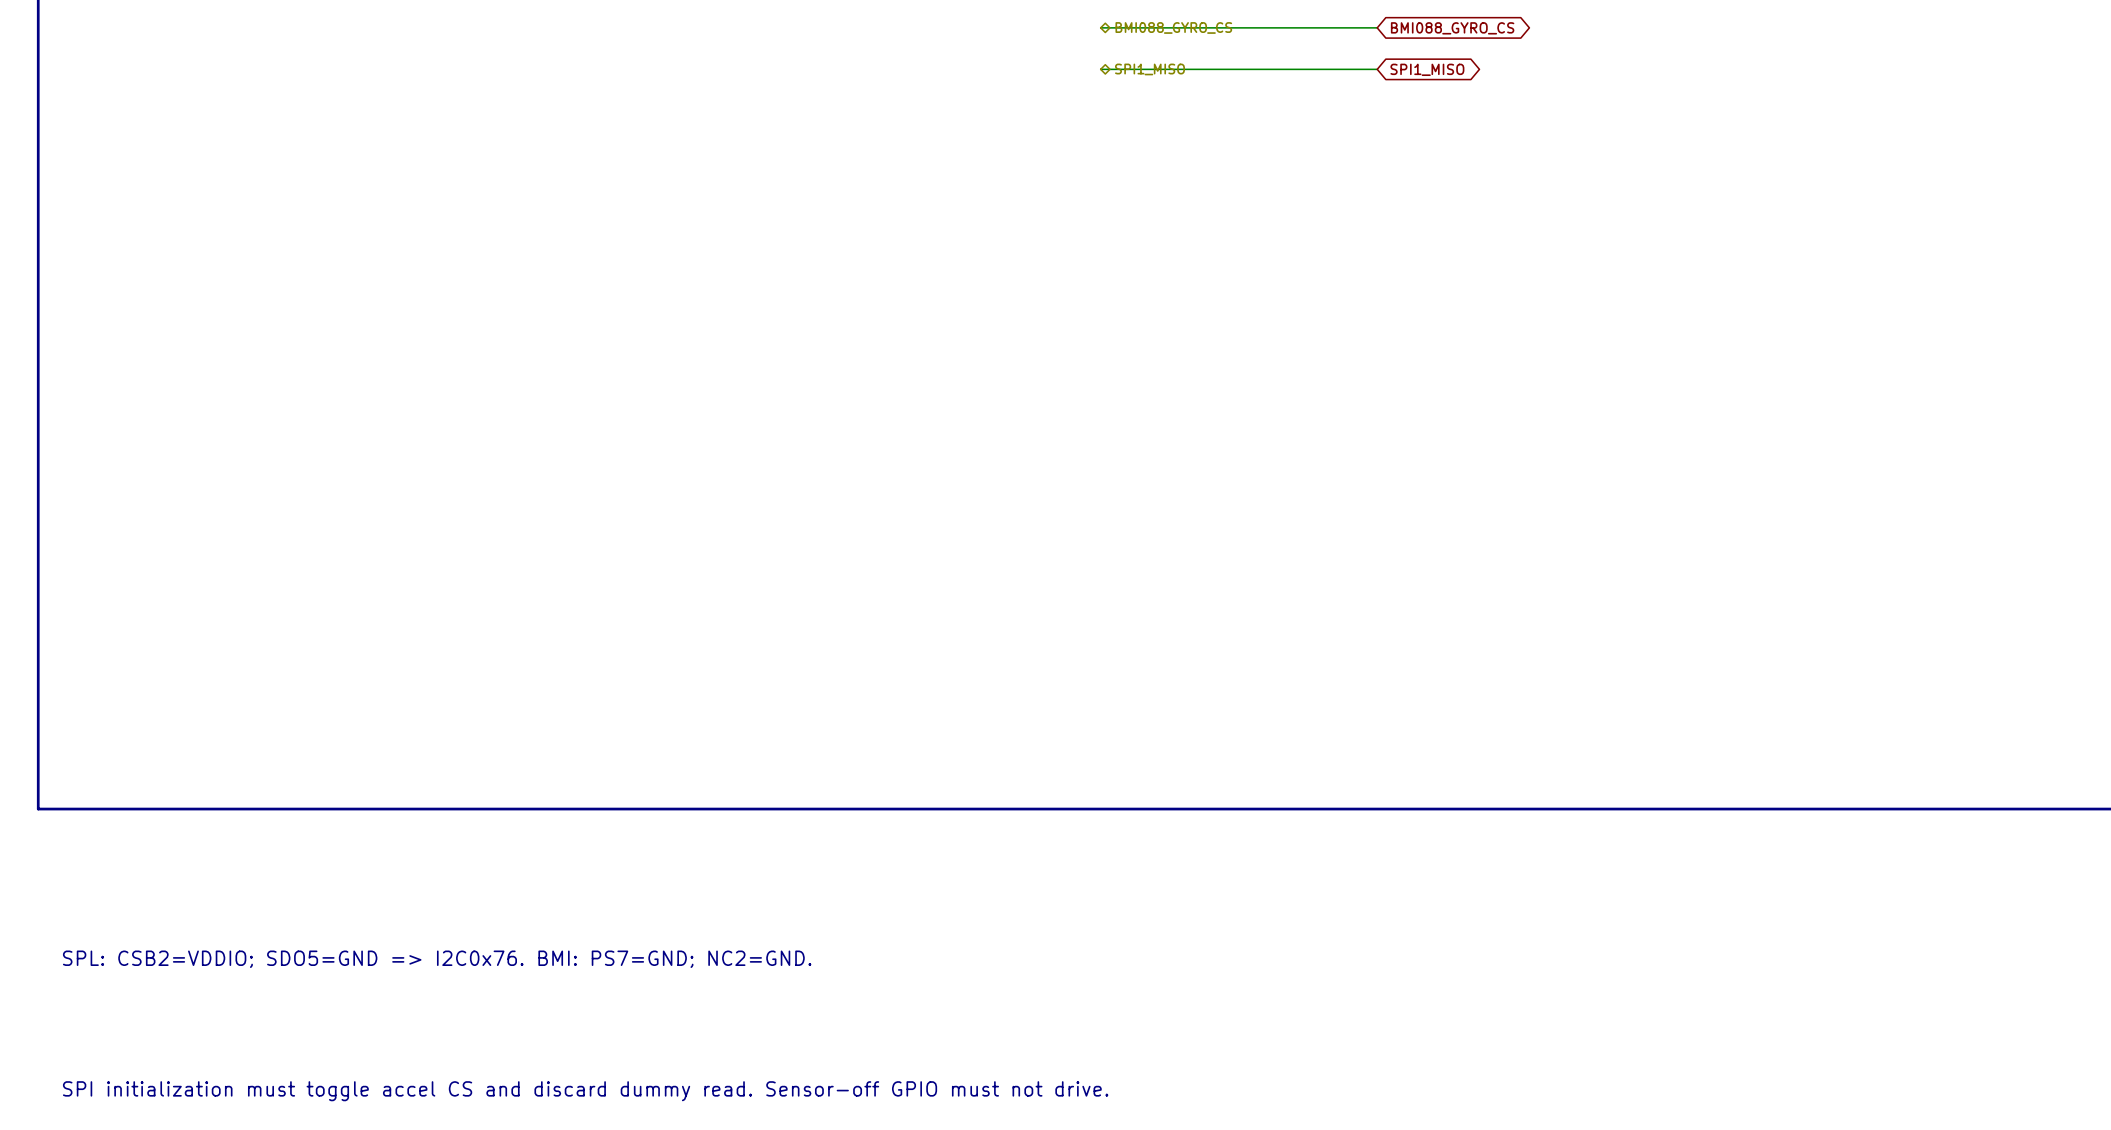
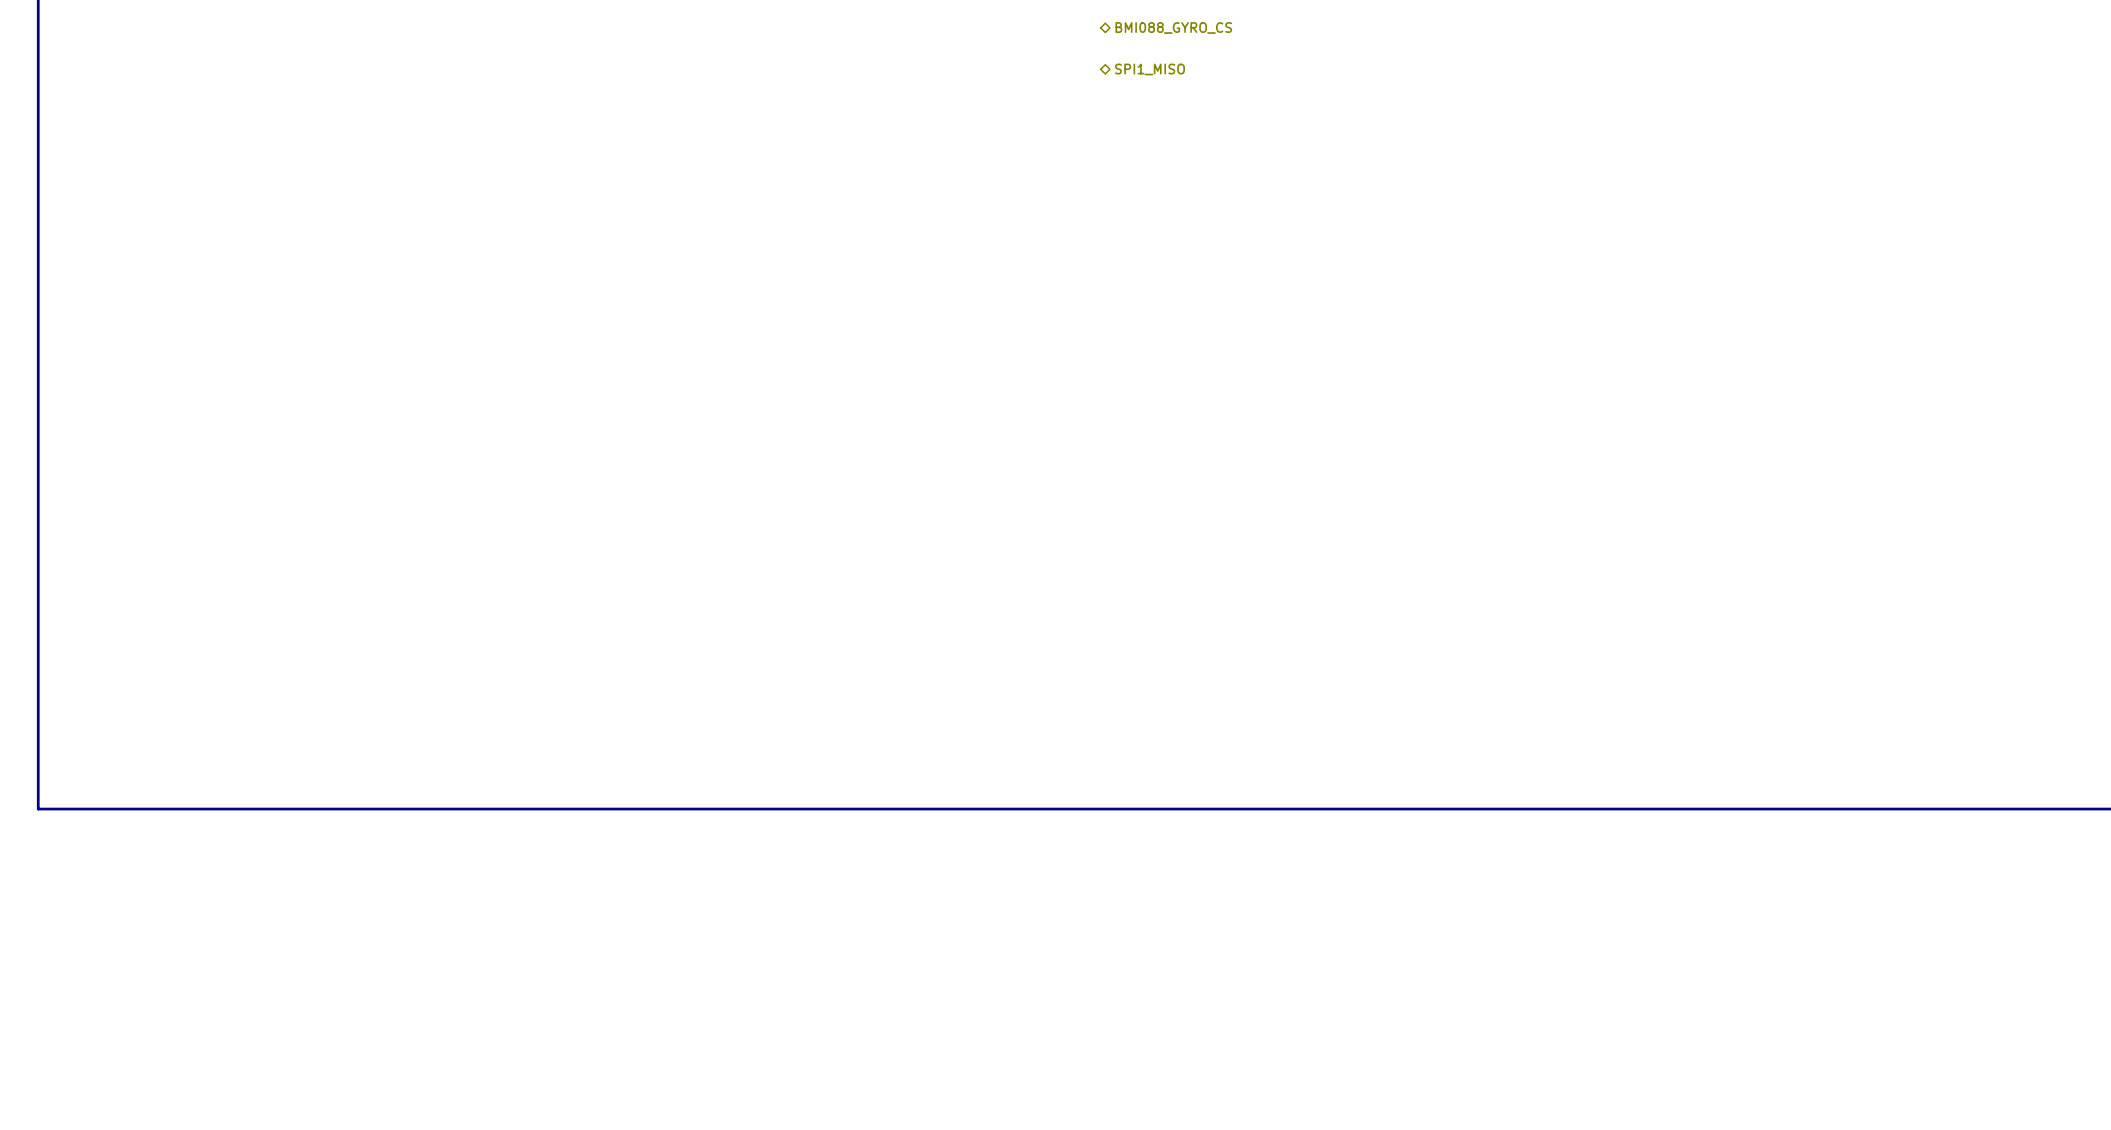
wire: (1100, 27) (1377, 27) -> none
global label: BMI088_GYRO_CS (1452, 28) -> none
wire: (1100, 69) (1377, 69) -> none
global label: SPI1_MISO (1427, 69) -> none
text: SPL: CSB2=VDDIO; SDO5=GND => I2C0x76. BMI: PS7=GND; NC2=GND. (437, 959) -> none
text: SPI initialization must toggle accel CS and discard dummy read. Sensor-off GPIO must not drive. (585, 1091) -> none

